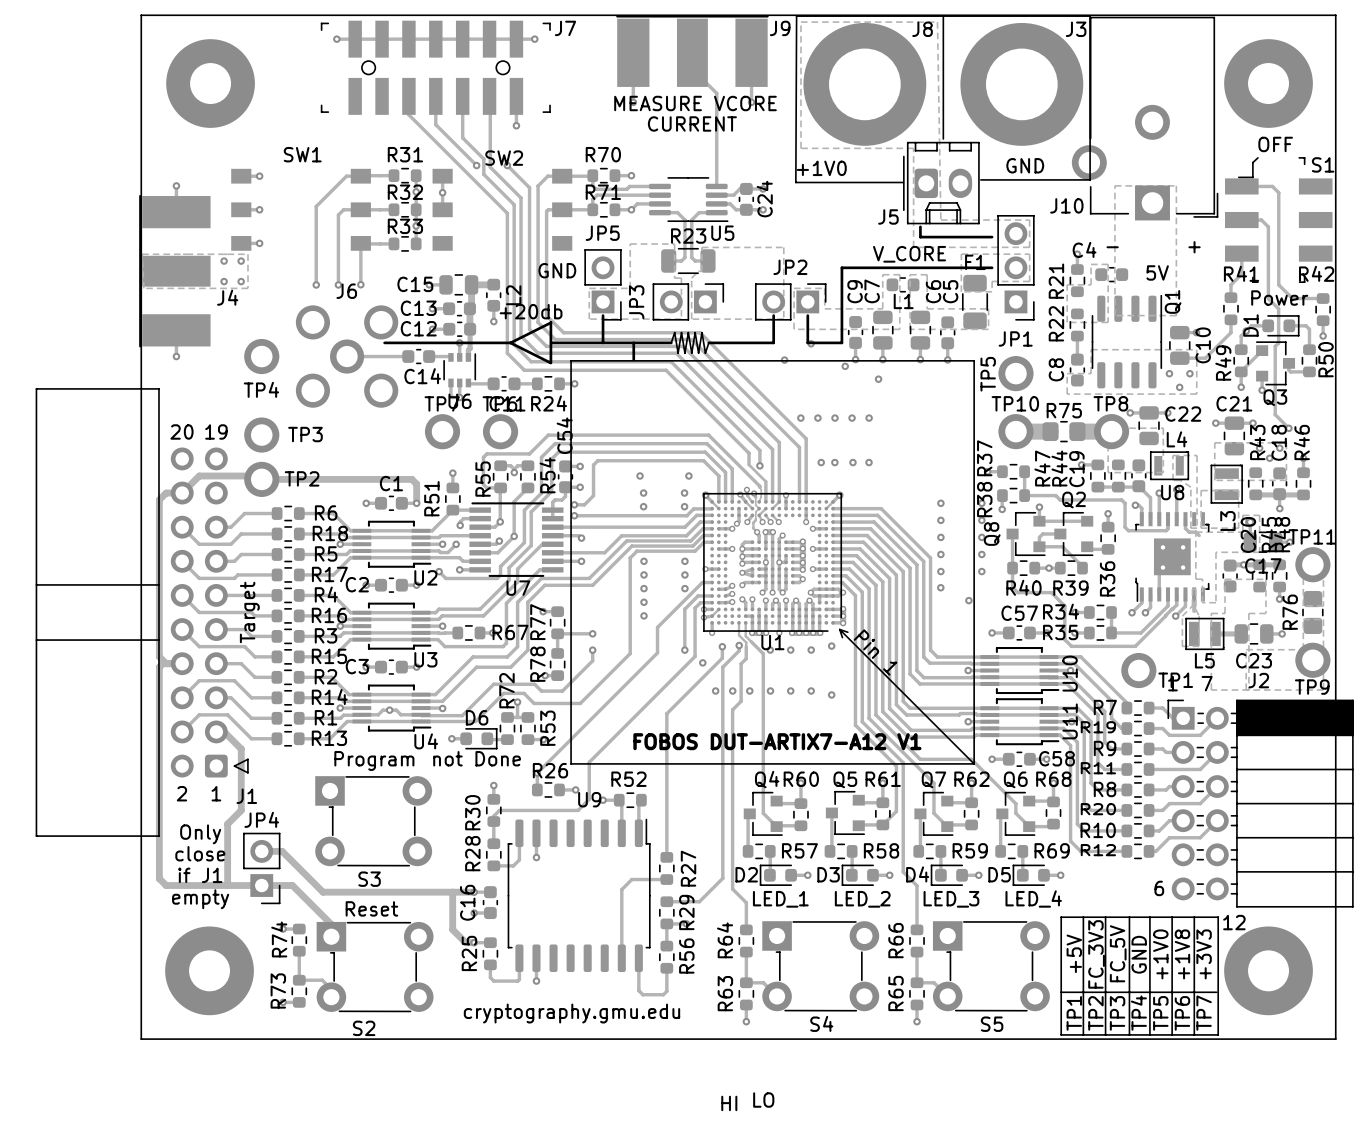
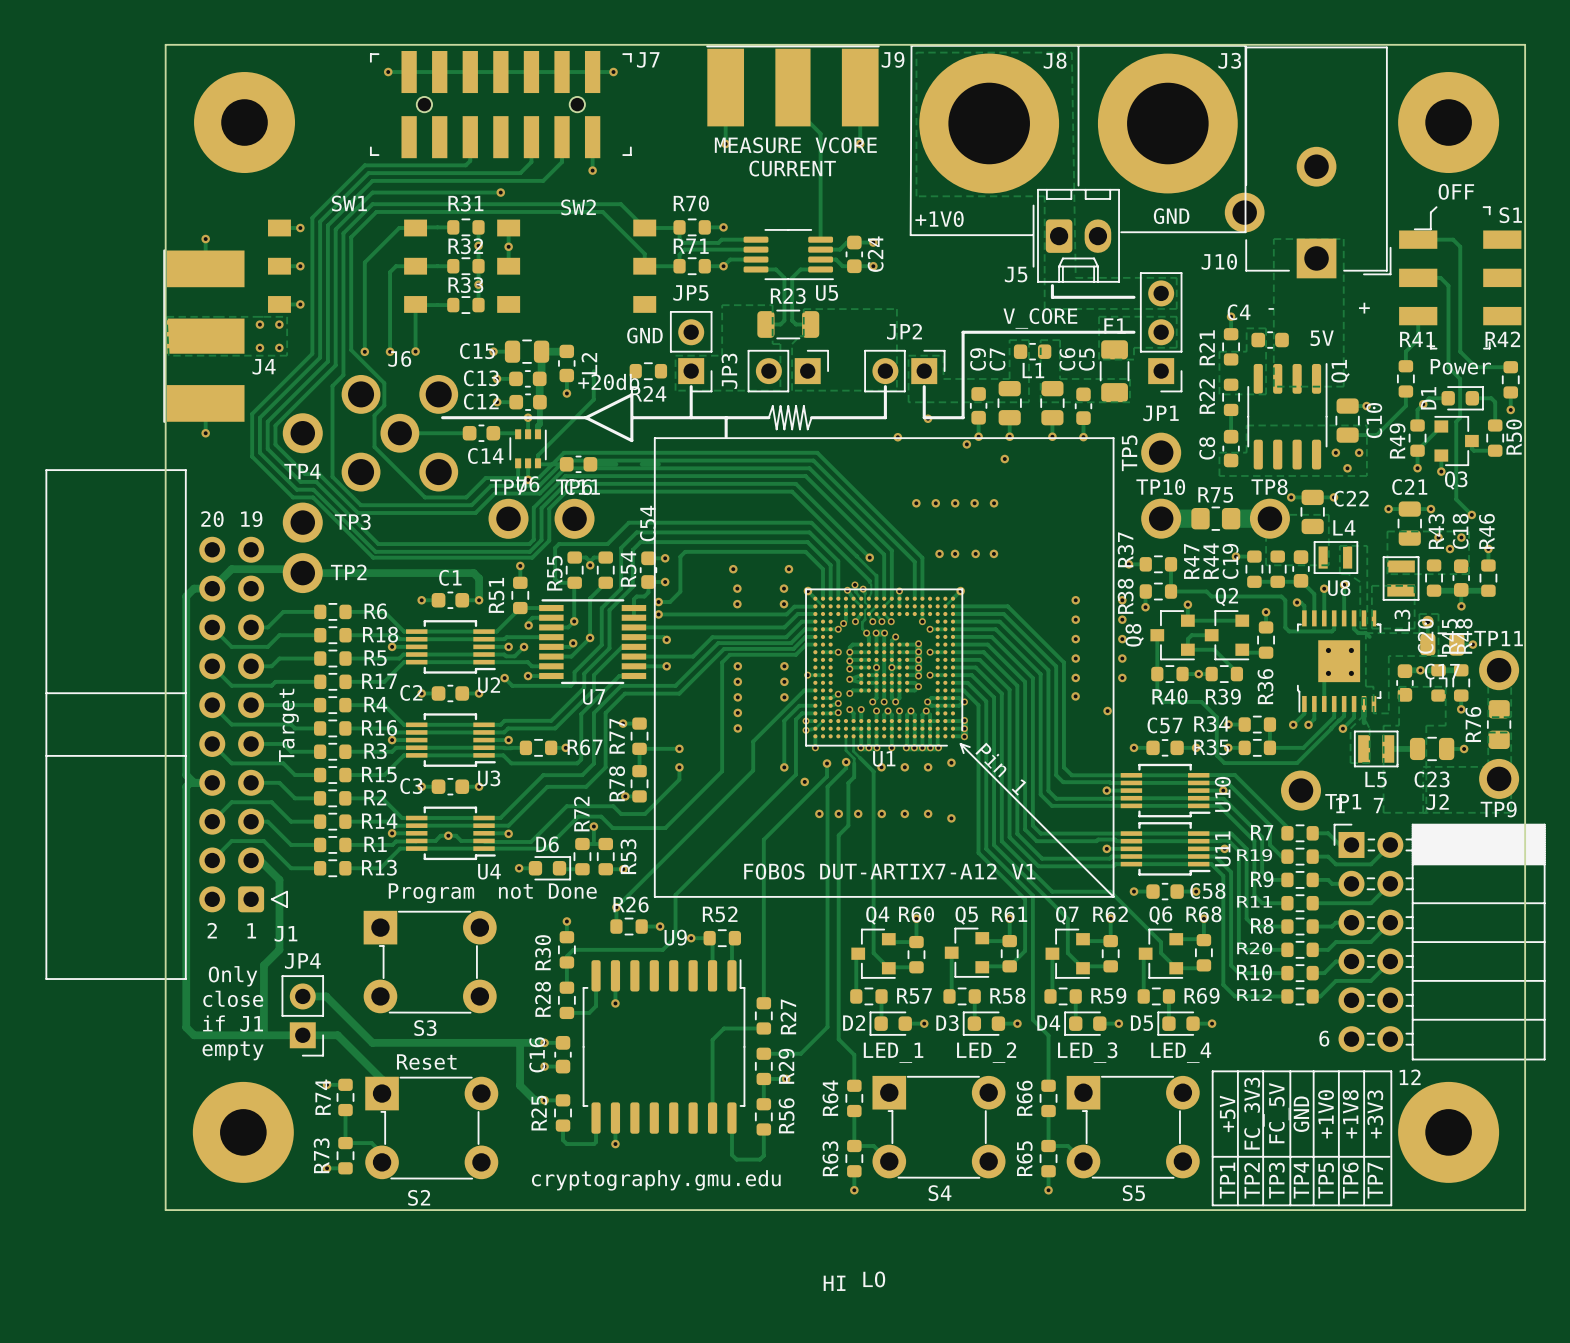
track: (435, 96) (435, 124) (476, 165) -> none
track: (490, 97) (490, 167) (521, 197) (521, 336) (538, 353) (676, 353) (772, 449) (772, 463) -> none
track: (408, 114) (507, 213) (507, 353) (524, 370) (666, 370) (749, 453) (749, 464) (765, 481) -> (470, 158) (465, 165) (364, 165) (312, 217) (312, 353) (252, 413) (252, 456) (292, 497) (313, 497) (373, 557) (532, 557) (549, 540) (549, 508) (566, 491) (792, 491) (876, 575)
track: (462, 118) (462, 137) (483, 159) (483, 174) (514, 204) (514, 344) (531, 361) (671, 361) (703, 394) -> (562, 137) (562, 162) (543, 180) (372, 180) (327, 225) (327, 361) (267, 421) (267, 448) (300, 481) (316, 481) (378, 544) (529, 544) (533, 539) (533, 507) (565, 476) (805, 476)
track: none -> (531, 162) (520, 173) (368, 173) (320, 221) (320, 357) (259, 417) (259, 452) (296, 489) (313, 489) (375, 551) (529, 551) (541, 540) (541, 508) (565, 483) (795, 483) (869, 557)
via: none -> (500, 192)
via: (476, 165) -> none
track: (507, 165) (529, 187) (529, 329) (546, 346) (683, 346) (779, 442) (779, 459) -> (500, 192) (372, 192) (335, 229) (335, 365) (275, 425) (275, 444) (305, 474) (319, 474) (358, 512) (475, 512) (494, 493) (539, 493) (564, 468) (809, 468) (891, 550)
via: (507, 165) -> none
track: (562, 176) (547, 176) (538, 186) (538, 322) (555, 339) (691, 339) (799, 447) (799, 469) -> (644, 227) (620, 204) (372, 204) (343, 233) (343, 375) (332, 386) (332, 476) (360, 505) (471, 505) (491, 485) (539, 485) (564, 460) (813, 460) (914, 561)
track: (562, 209) (548, 209) (546, 211) (546, 315) (563, 332) (700, 332) (806, 438) (806, 466) -> (644, 266) (644, 253) (602, 211) (376, 211) (351, 237) (351, 350) (384, 383) (384, 405) (374, 415) (374, 446) (425, 497) (466, 497) (485, 478) (538, 478) (564, 452) (817, 452) (922, 557)
track: none -> (593, 371) (593, 399) (538, 455) (538, 463)
R24 position: (548, 383) -> (648, 371)
via: (574, 383) -> none
track: (759, 450) (759, 465) -> (869, 540) (884, 554)

